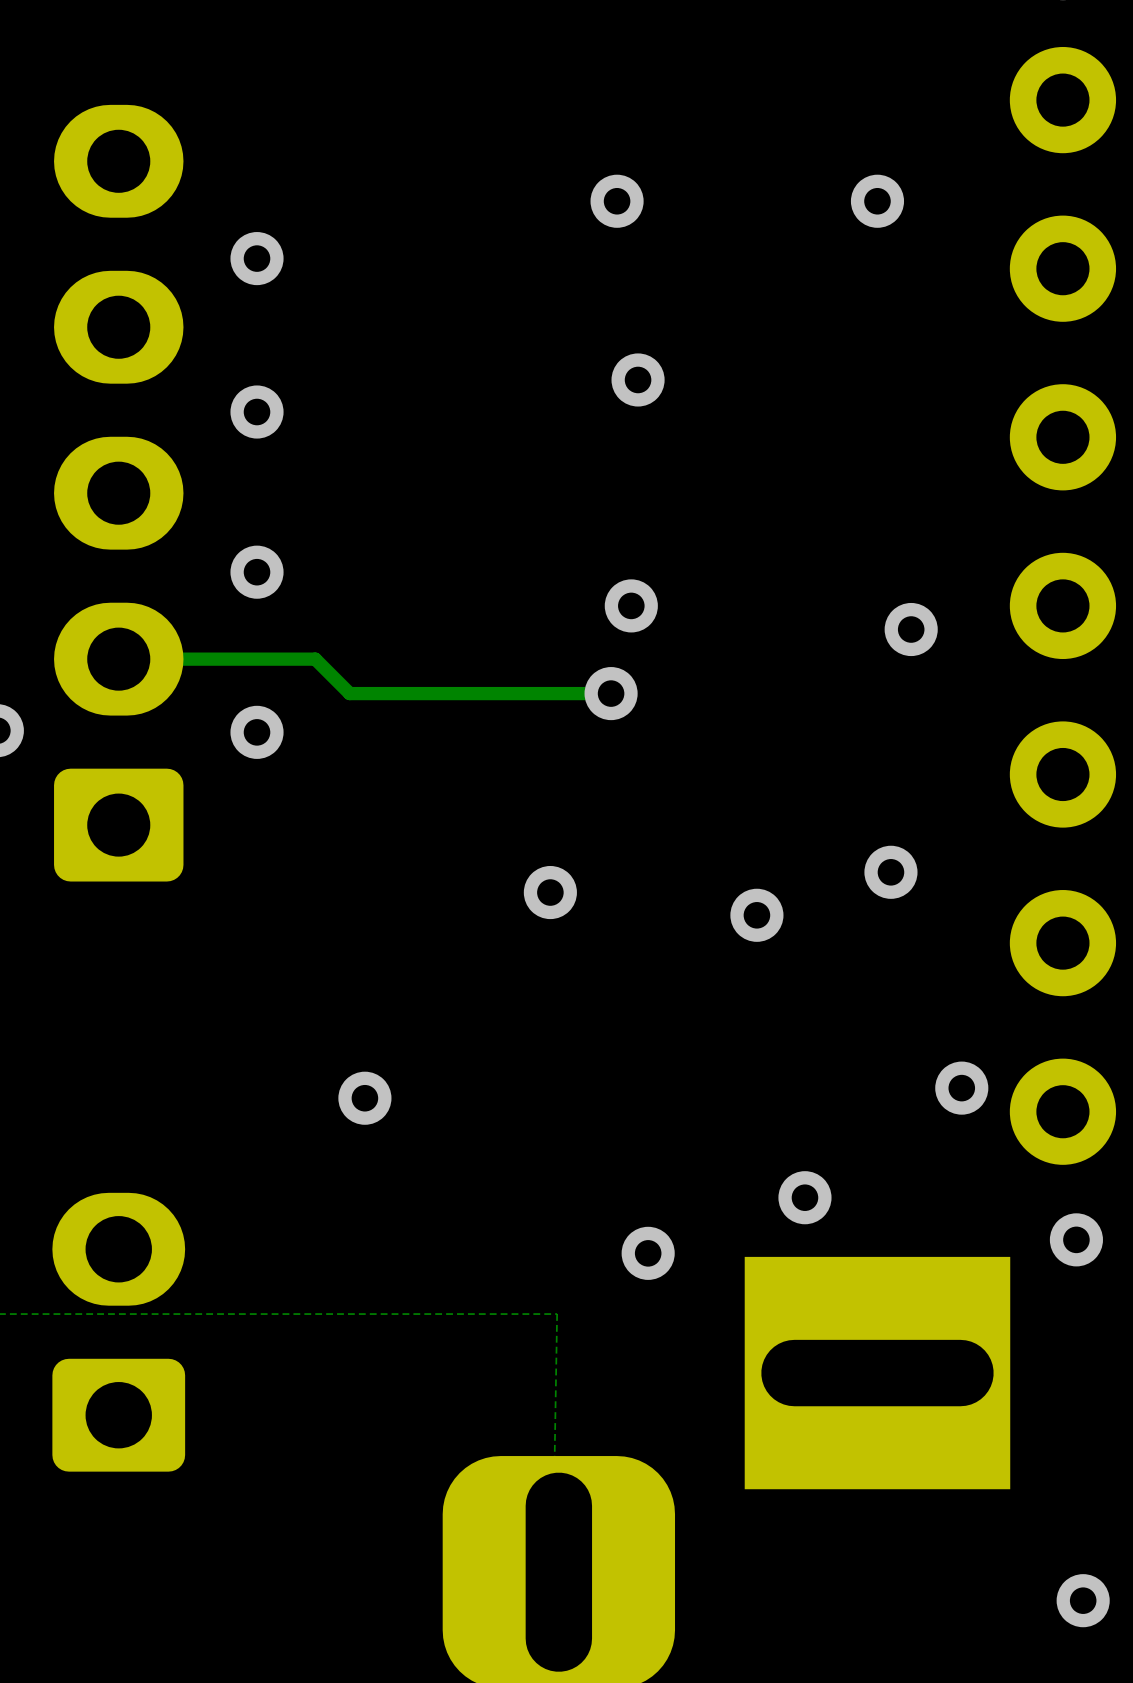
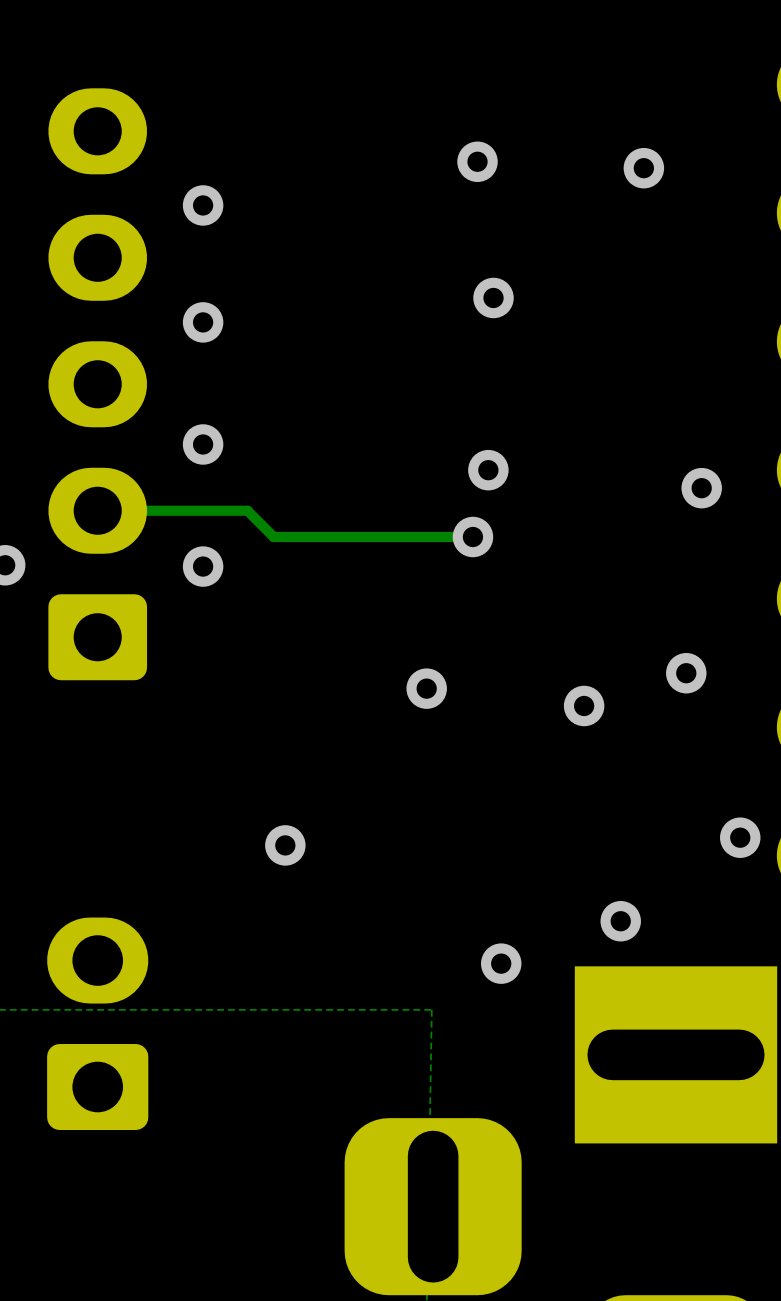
via position: (877, 201) -> (643, 168)

